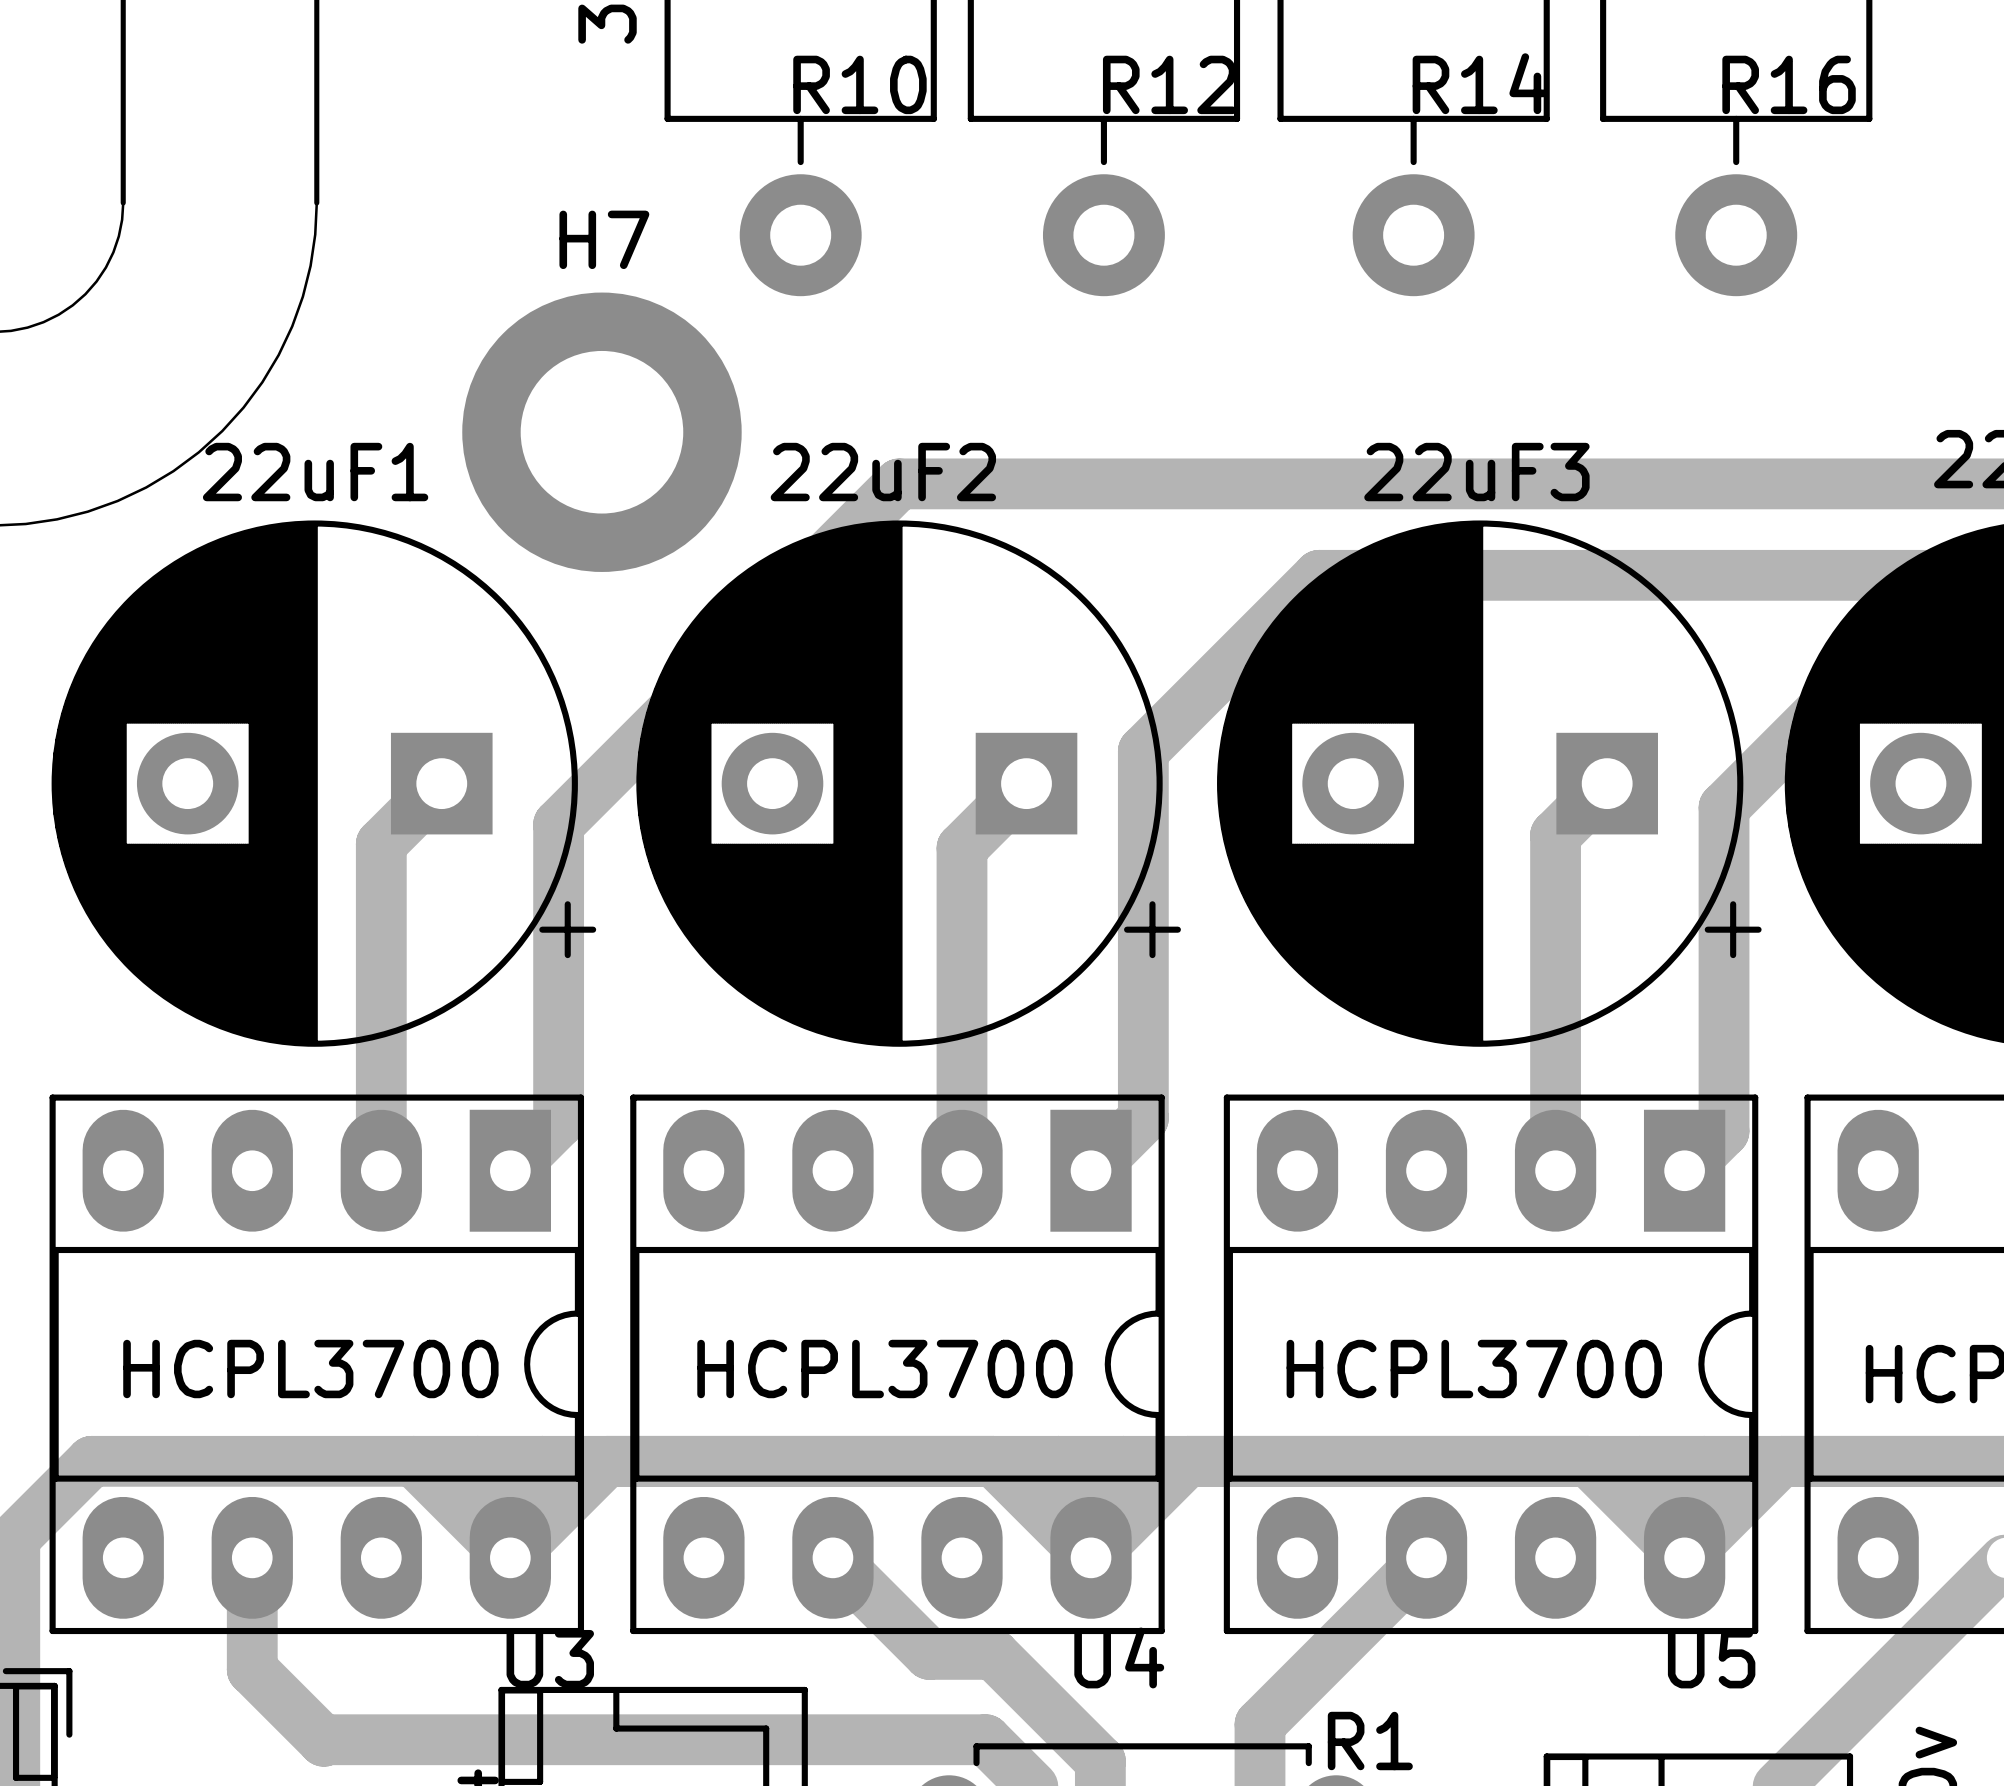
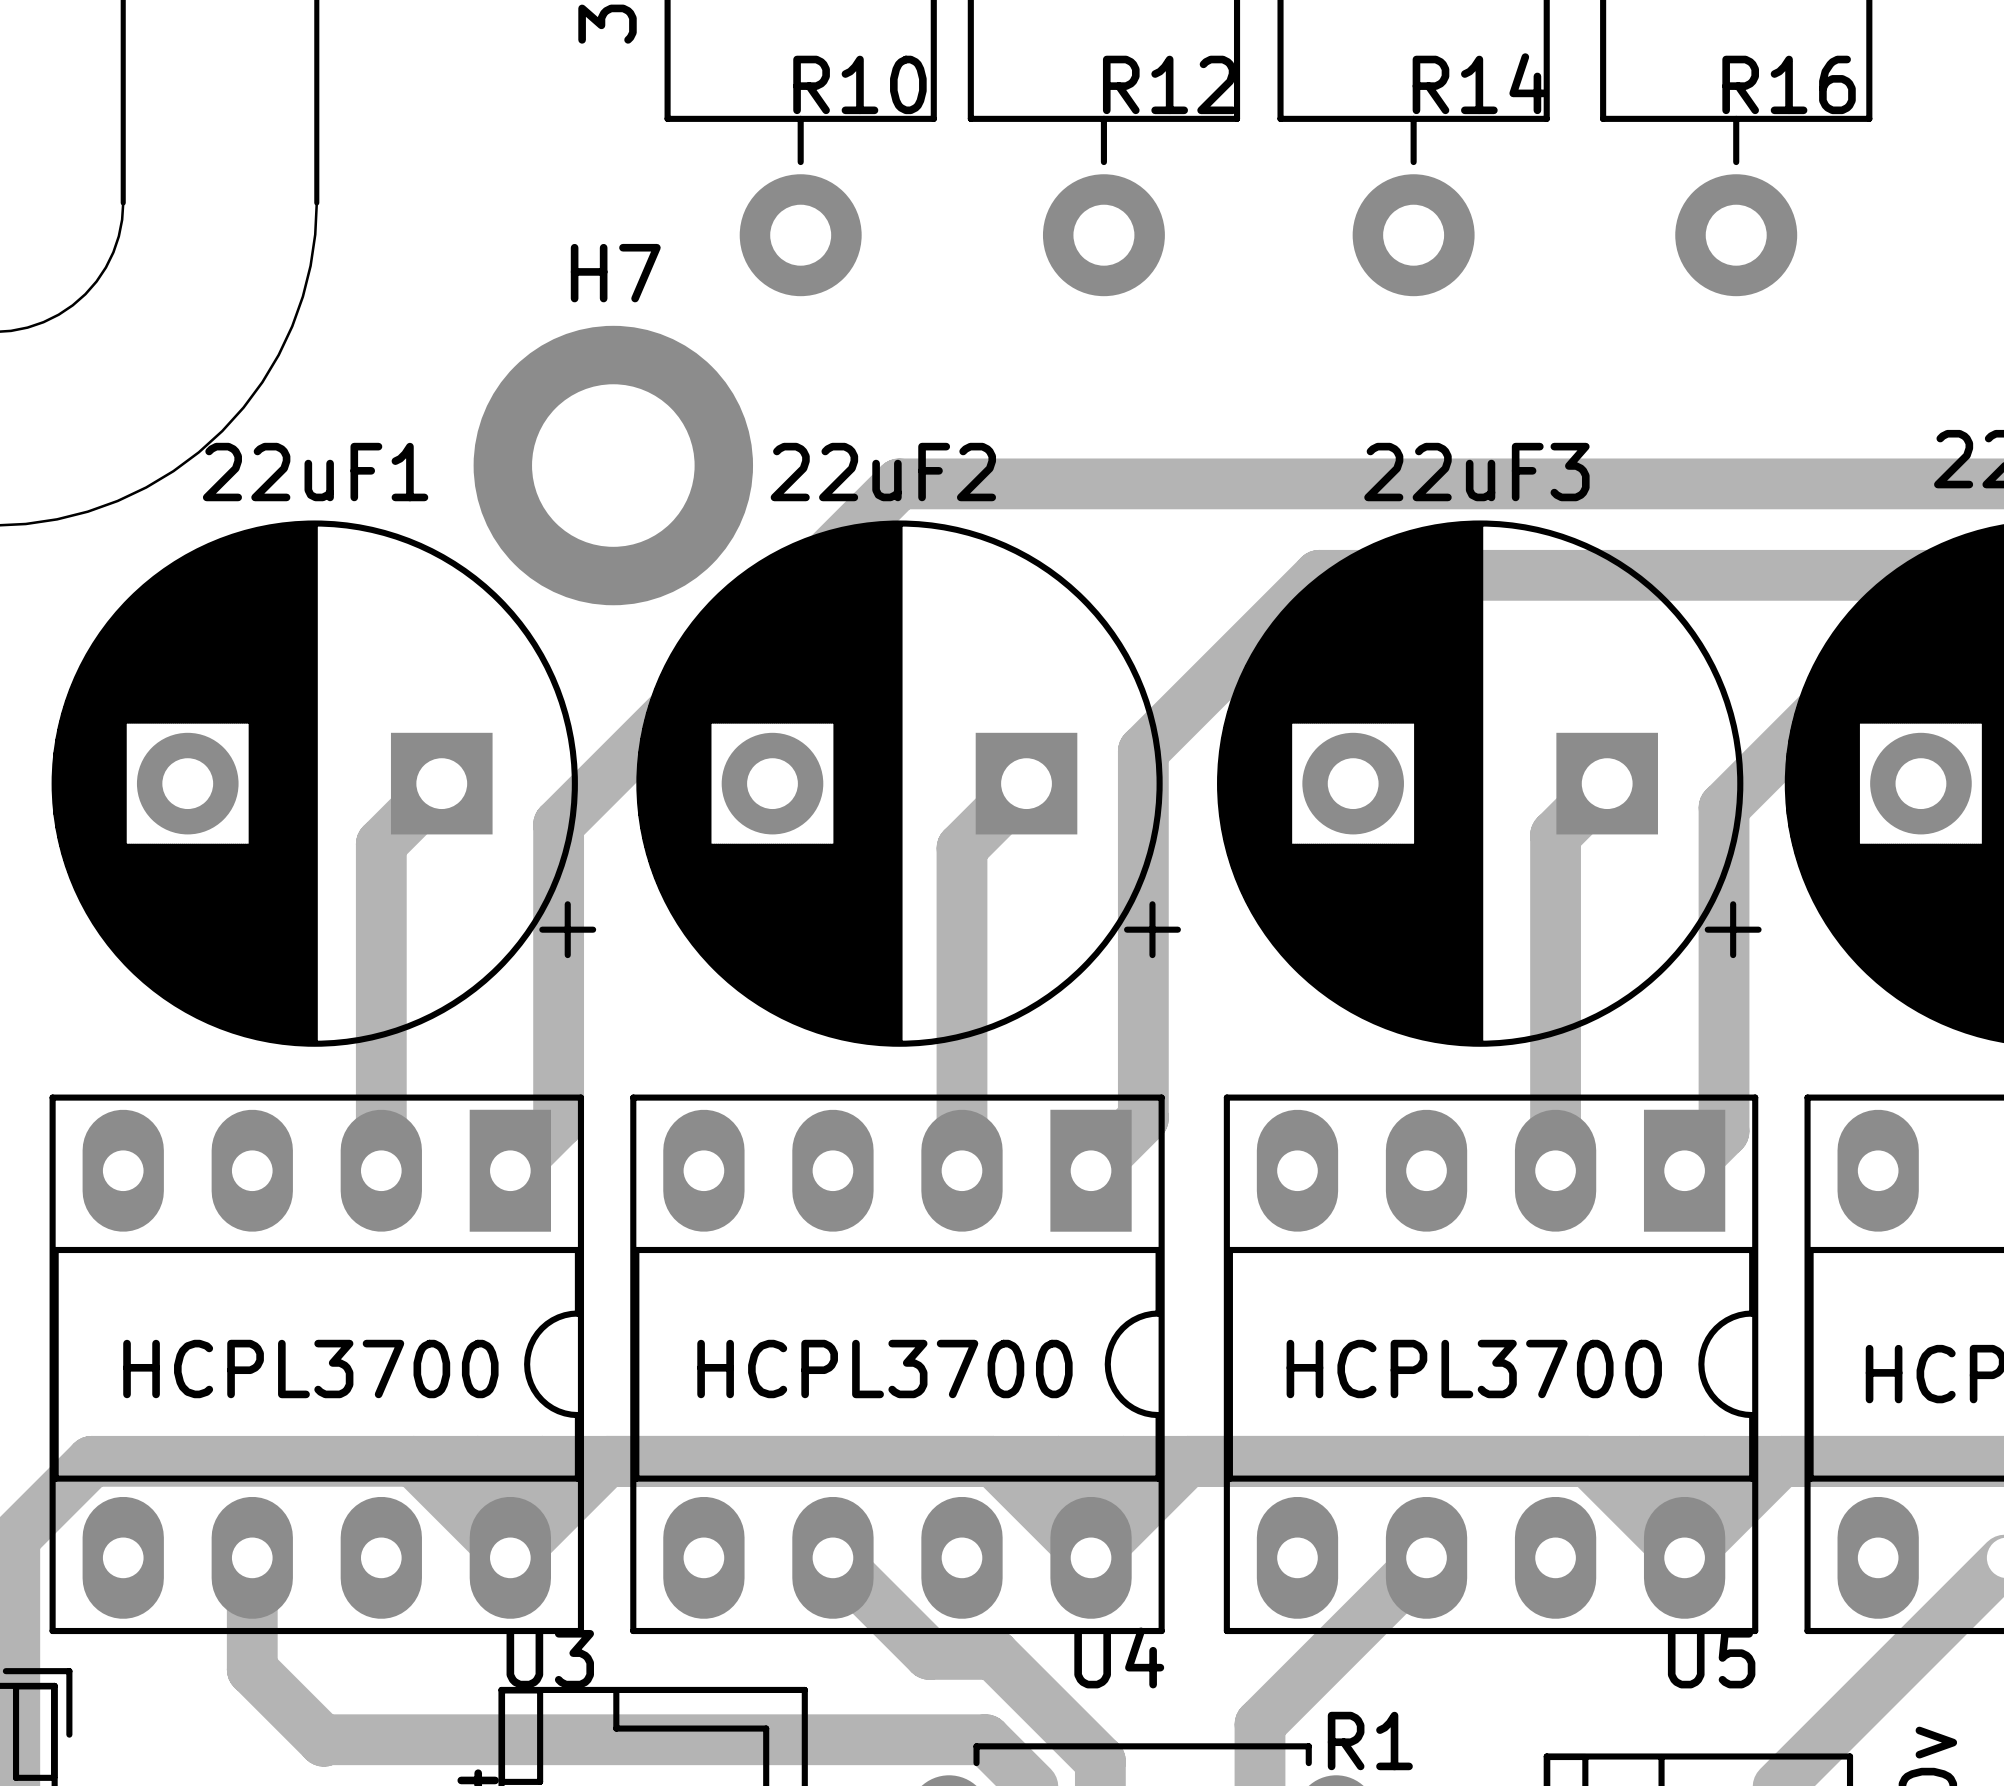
H7 position: (601, 432) -> (613, 465)

